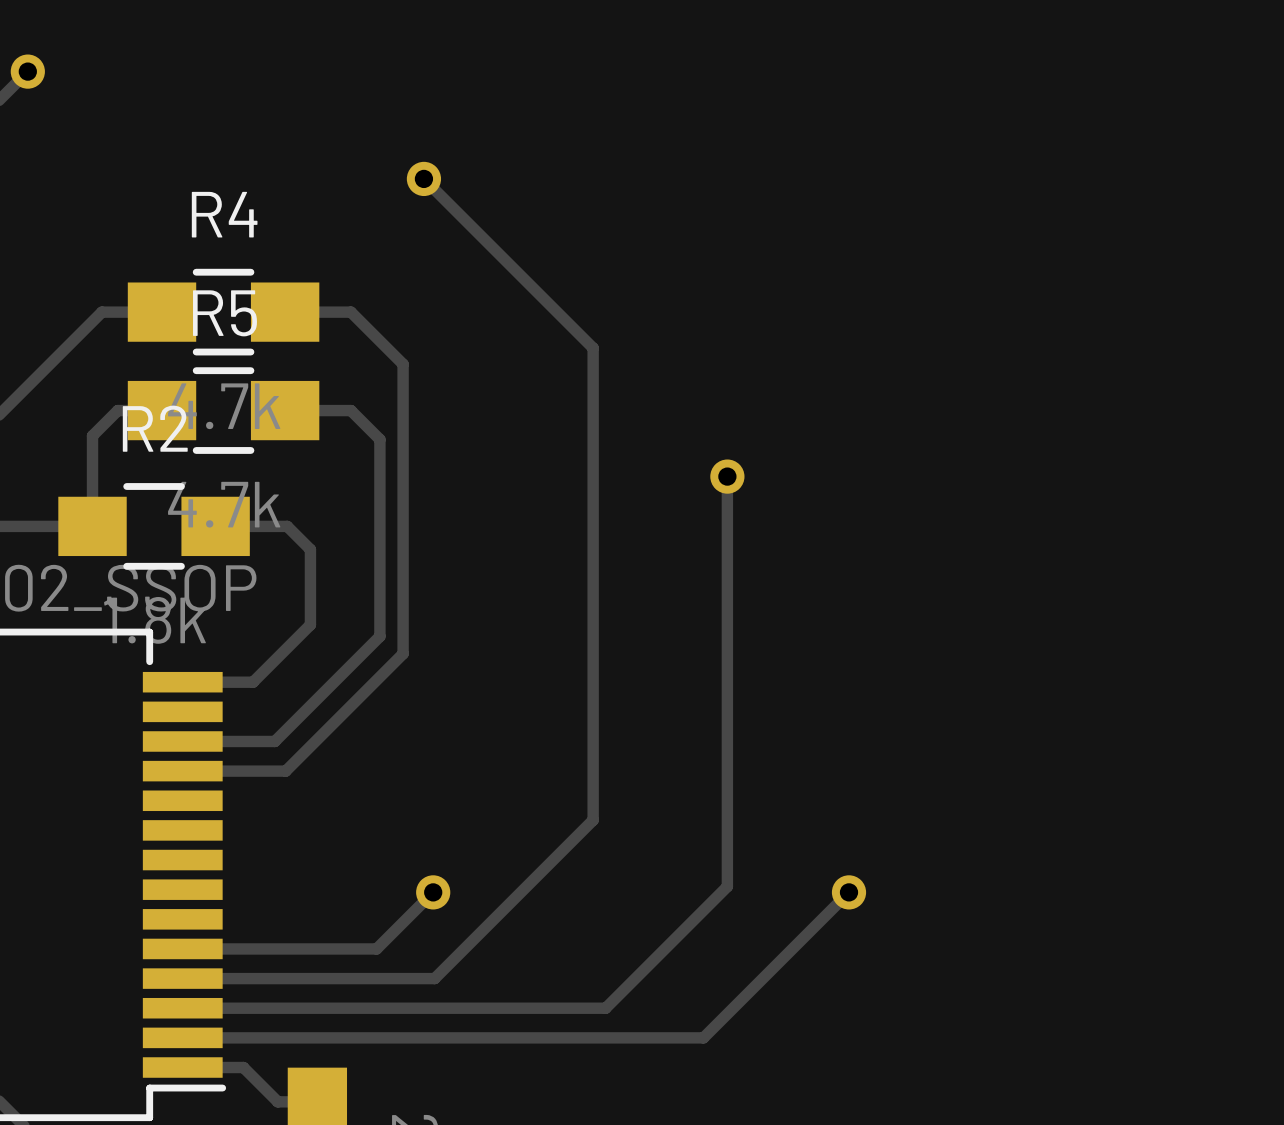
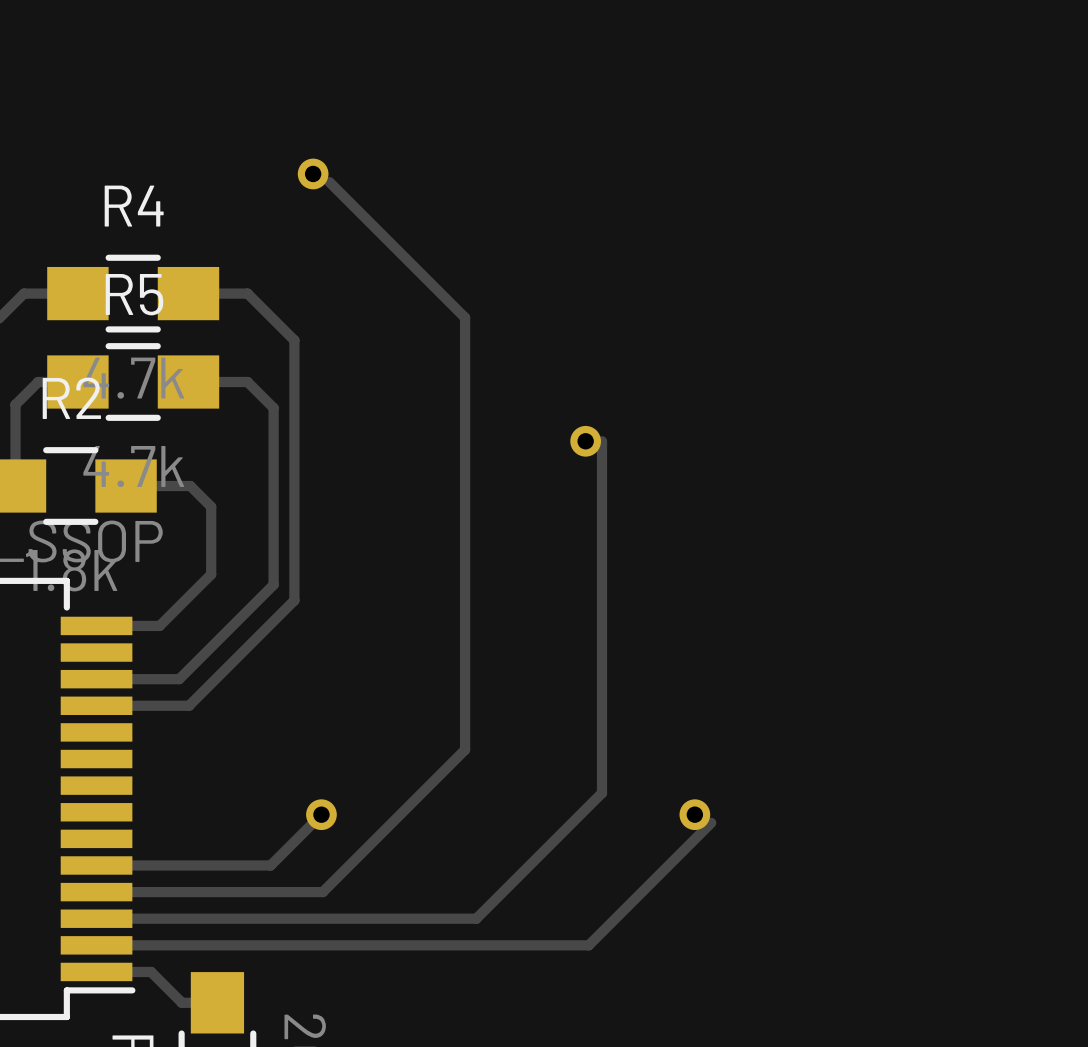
track: (423, 178) (593, 348) -> (329, 182) (465, 317) (465, 325)
track: (727, 476) (727, 886) -> (602, 441) (602, 793) (585, 809)
track: (849, 892) (703, 1037) -> (711, 822) (588, 945) (564, 945)

